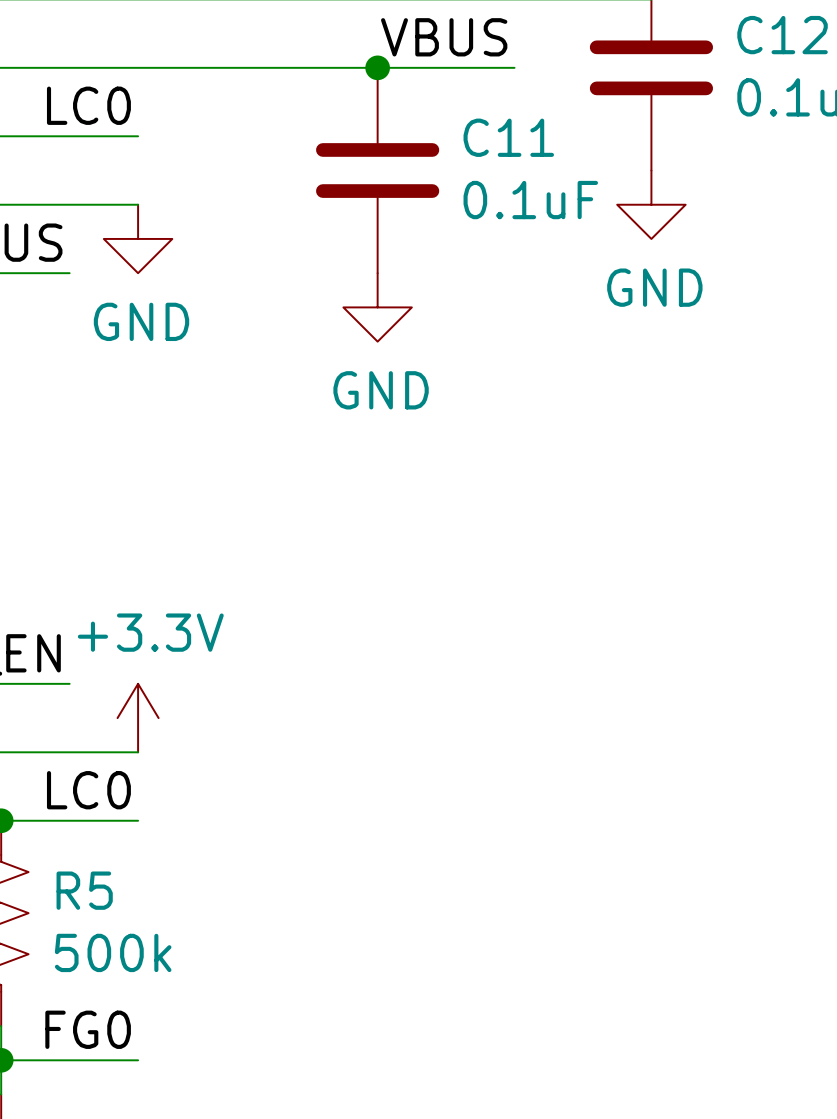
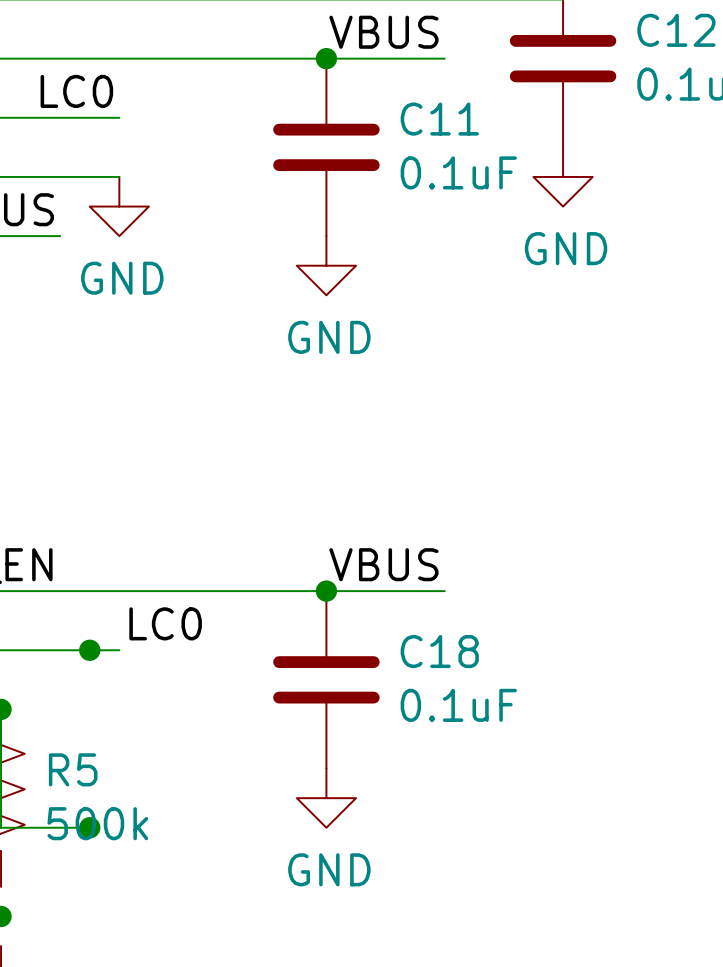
label: none -> VBUS (383, 564)
wire: none -> (60, 591) (444, 591)
junction: none -> (326, 591)
power symbol: +3.3V (138, 718) -> none
junction: none -> (89, 650)
C18: none -> 0.1uF (326, 679)
label position: LC0 (88, 790) -> LC0 (165, 623)
wire: (1, 820) (138, 820) -> (1, 709) (1, 827) (89, 827)
power symbol: none -> GND (326, 798)
junction: none -> (89, 827)
wire: (1, 1026) (1, 1094) -> none
label: FG0 (88, 1029) -> none
wire: (1, 1060) (138, 1060) -> none

